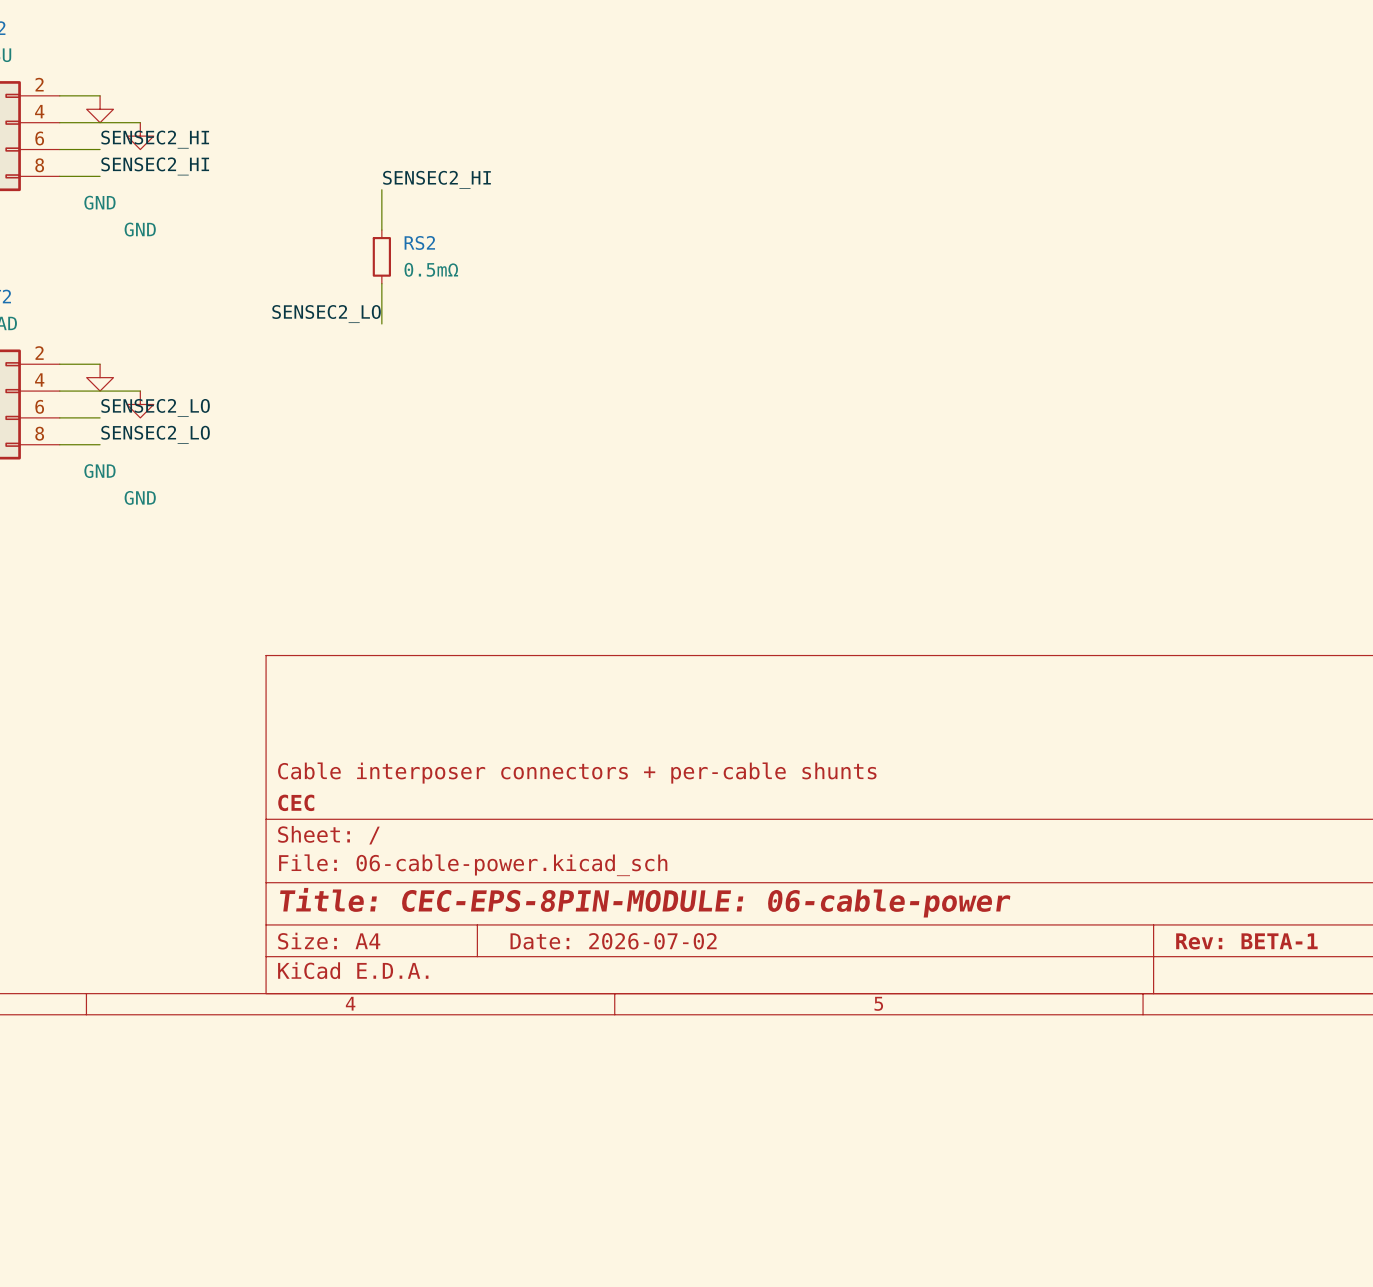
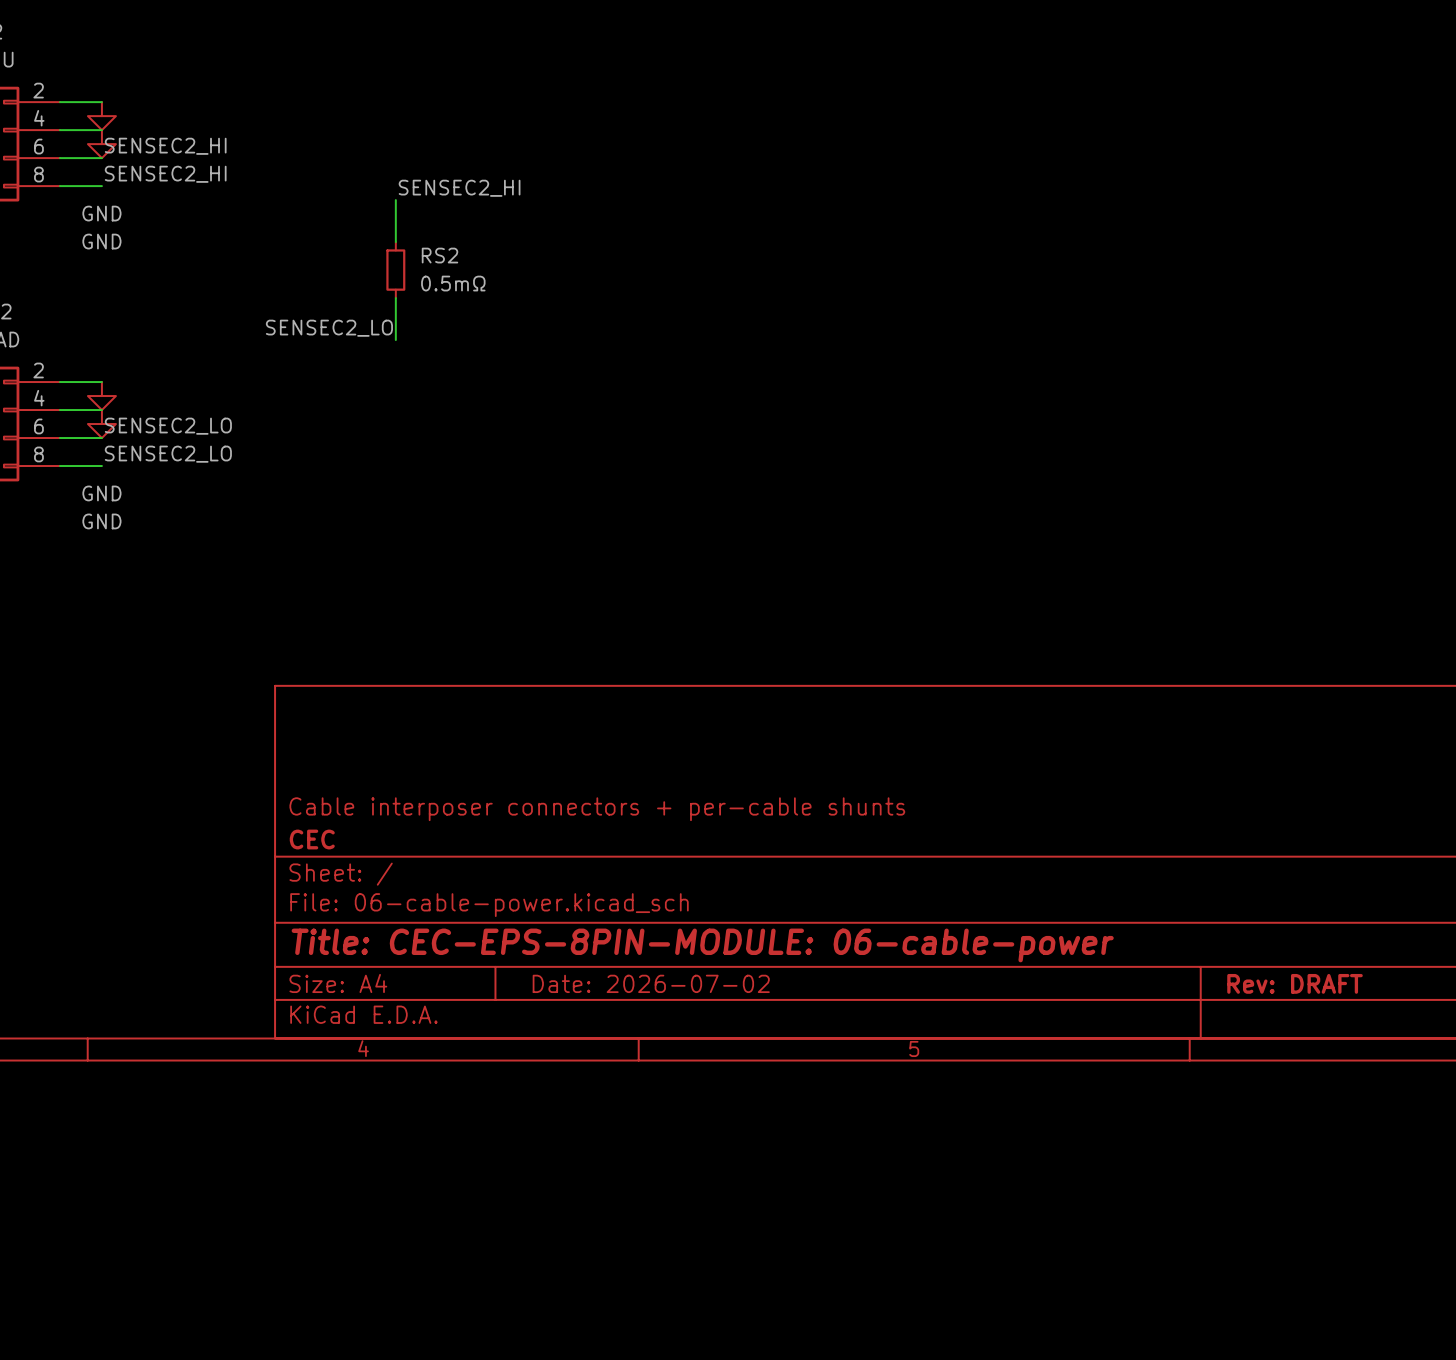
wire: (100, 122) (140, 122) -> none
power symbol position: GND (140, 136) -> GND (101, 144)
wire: (100, 391) (140, 391) -> none
power symbol position: GND (140, 404) -> GND (101, 424)
title block: Rev: BETA-1 (1246, 941) -> Rev: DRAFT (1295, 983)

